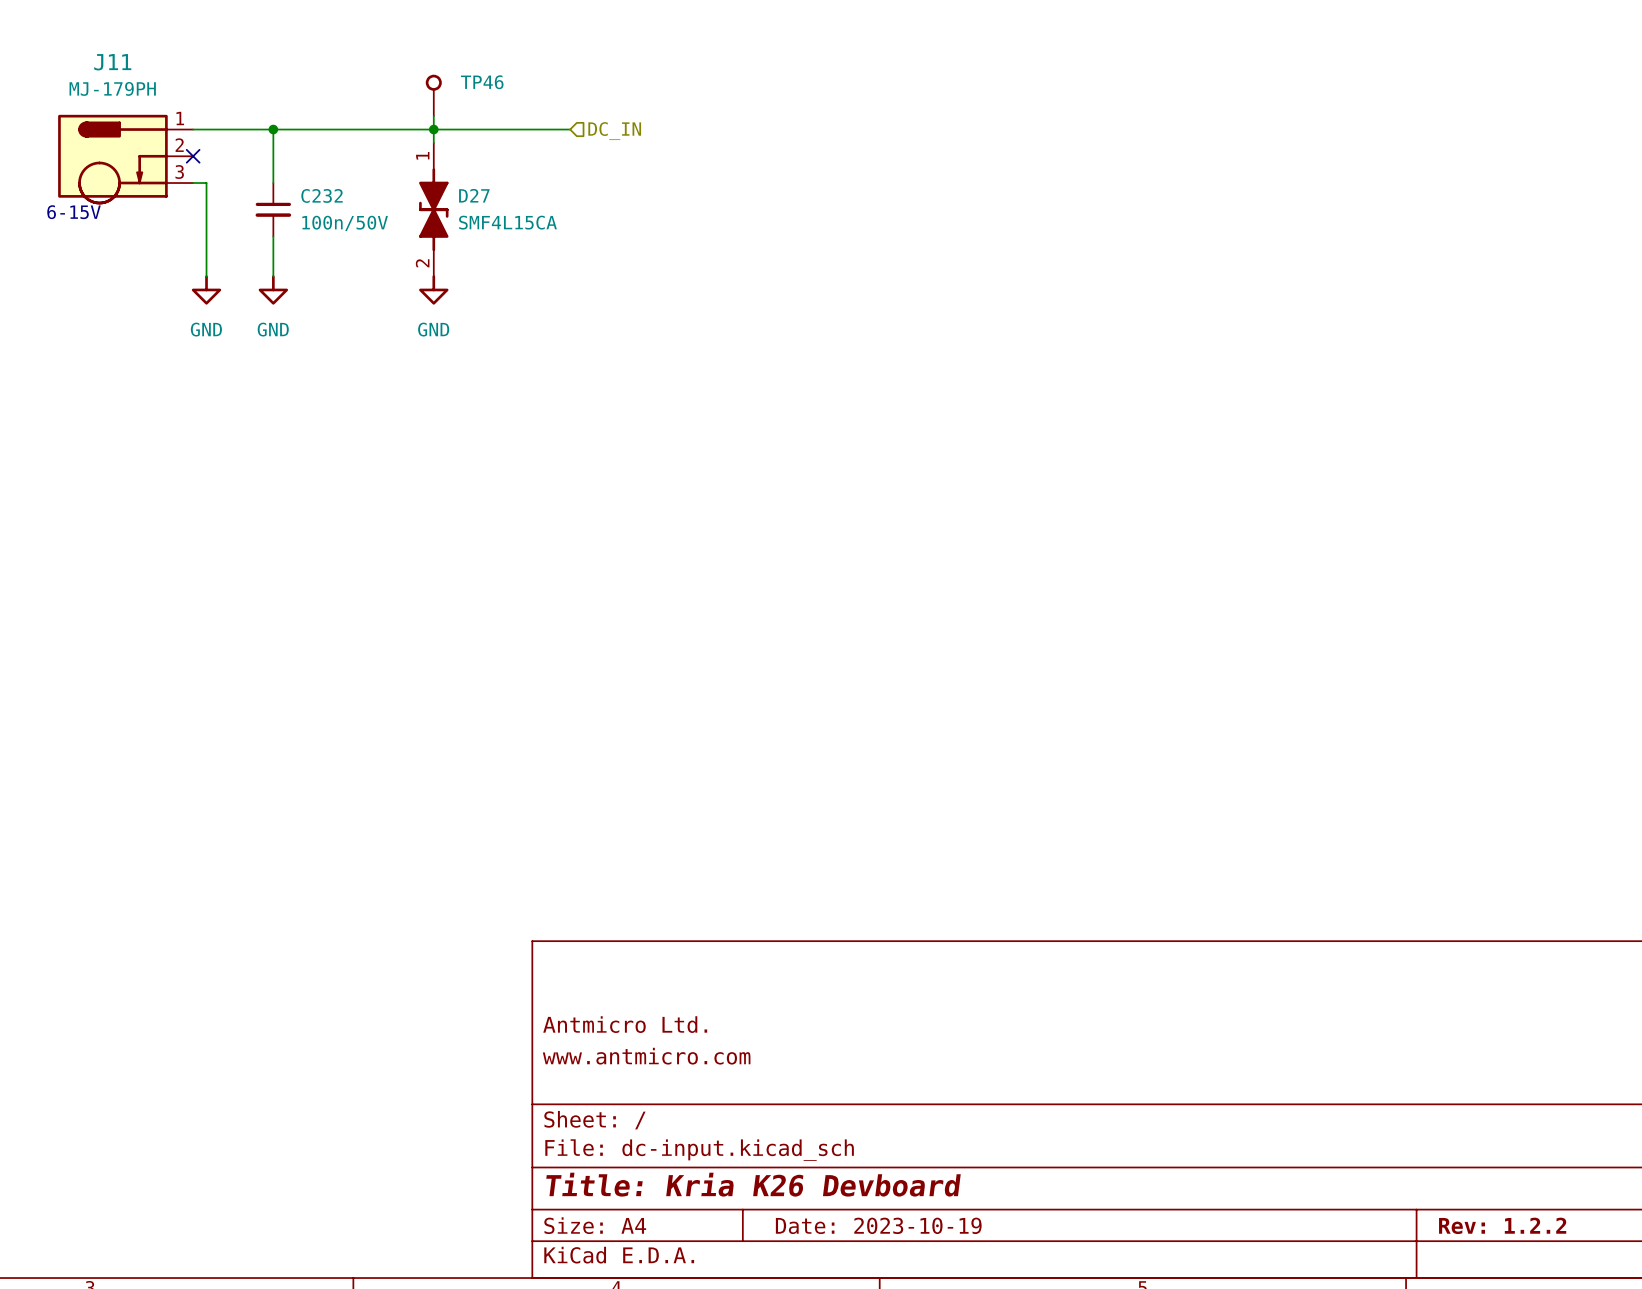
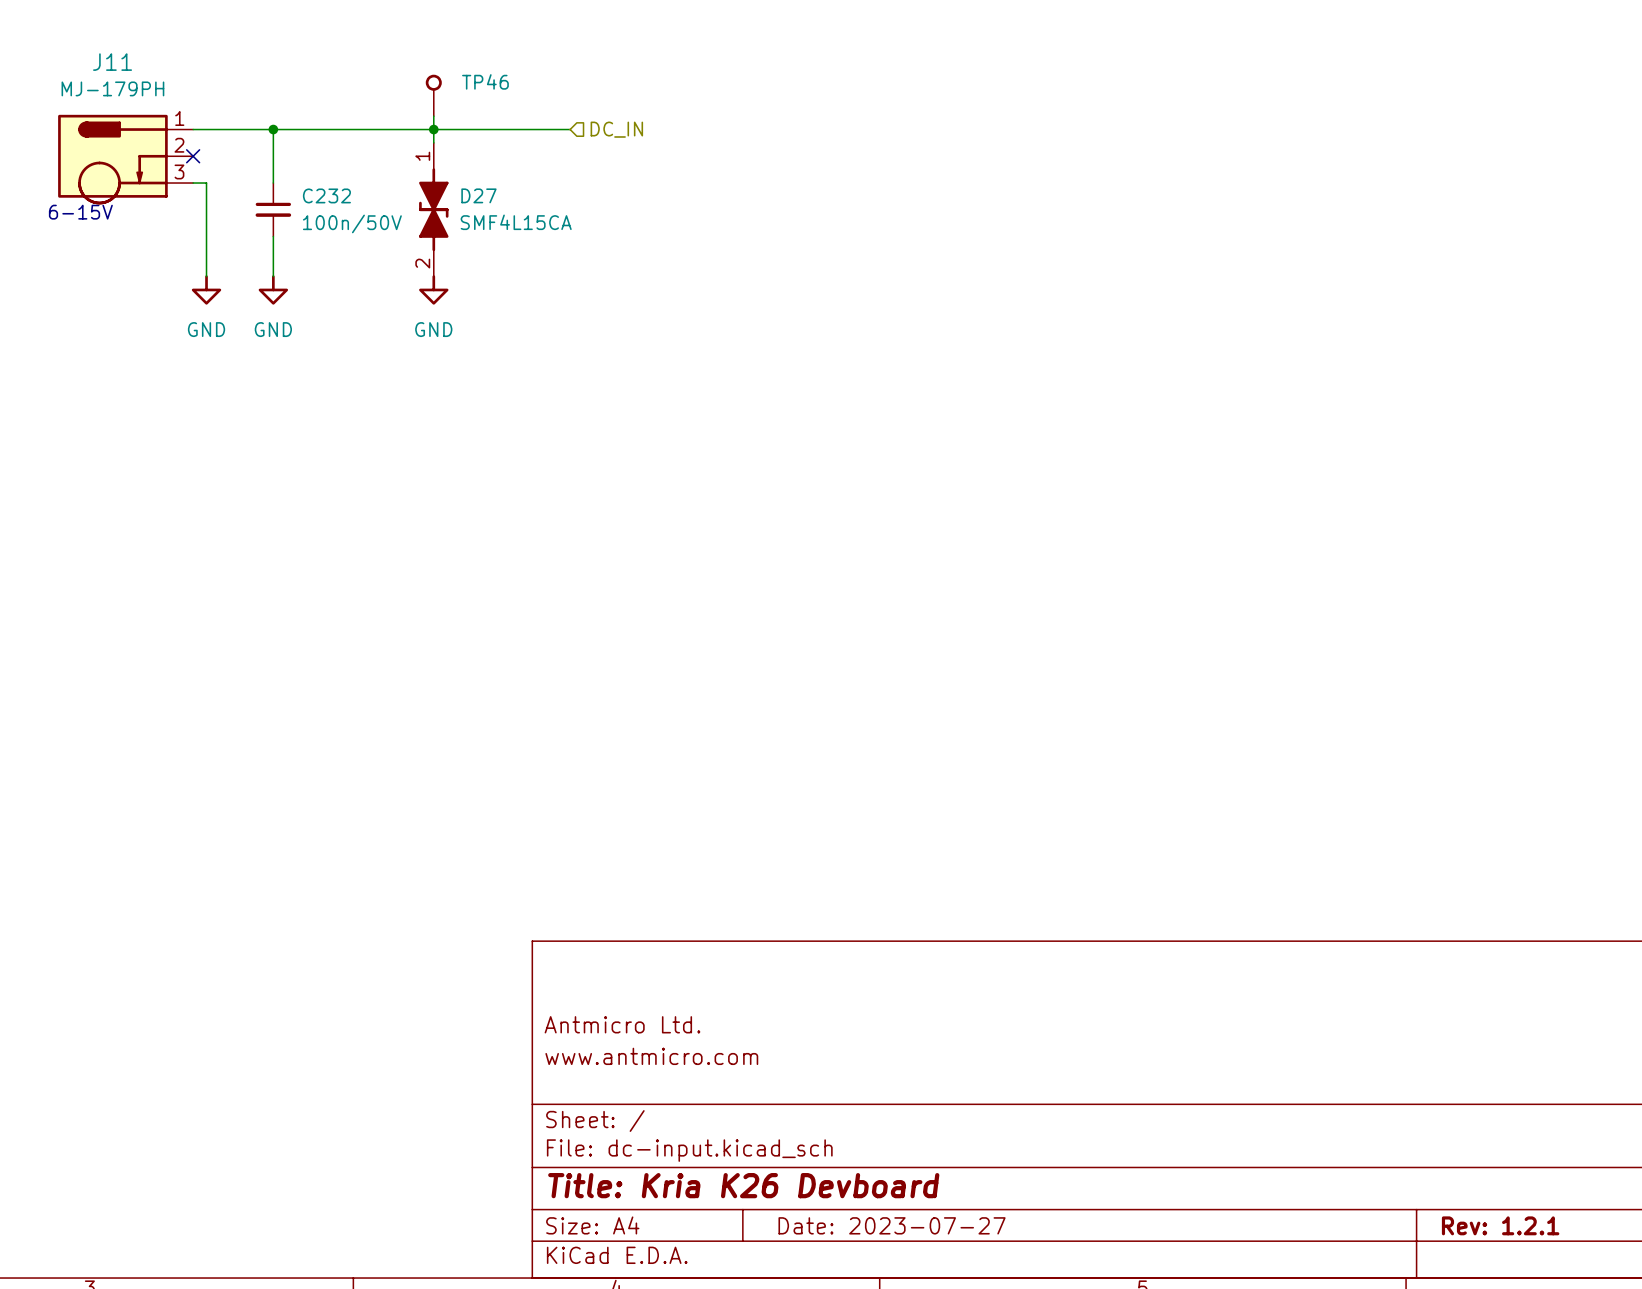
title block: Date: 2023-10-19 (878, 1225) -> Date: 2023-07-27 (892, 1225)
title block: Rev: 1.2.2 (1502, 1225) -> Rev: 1.2.1 (1500, 1225)

